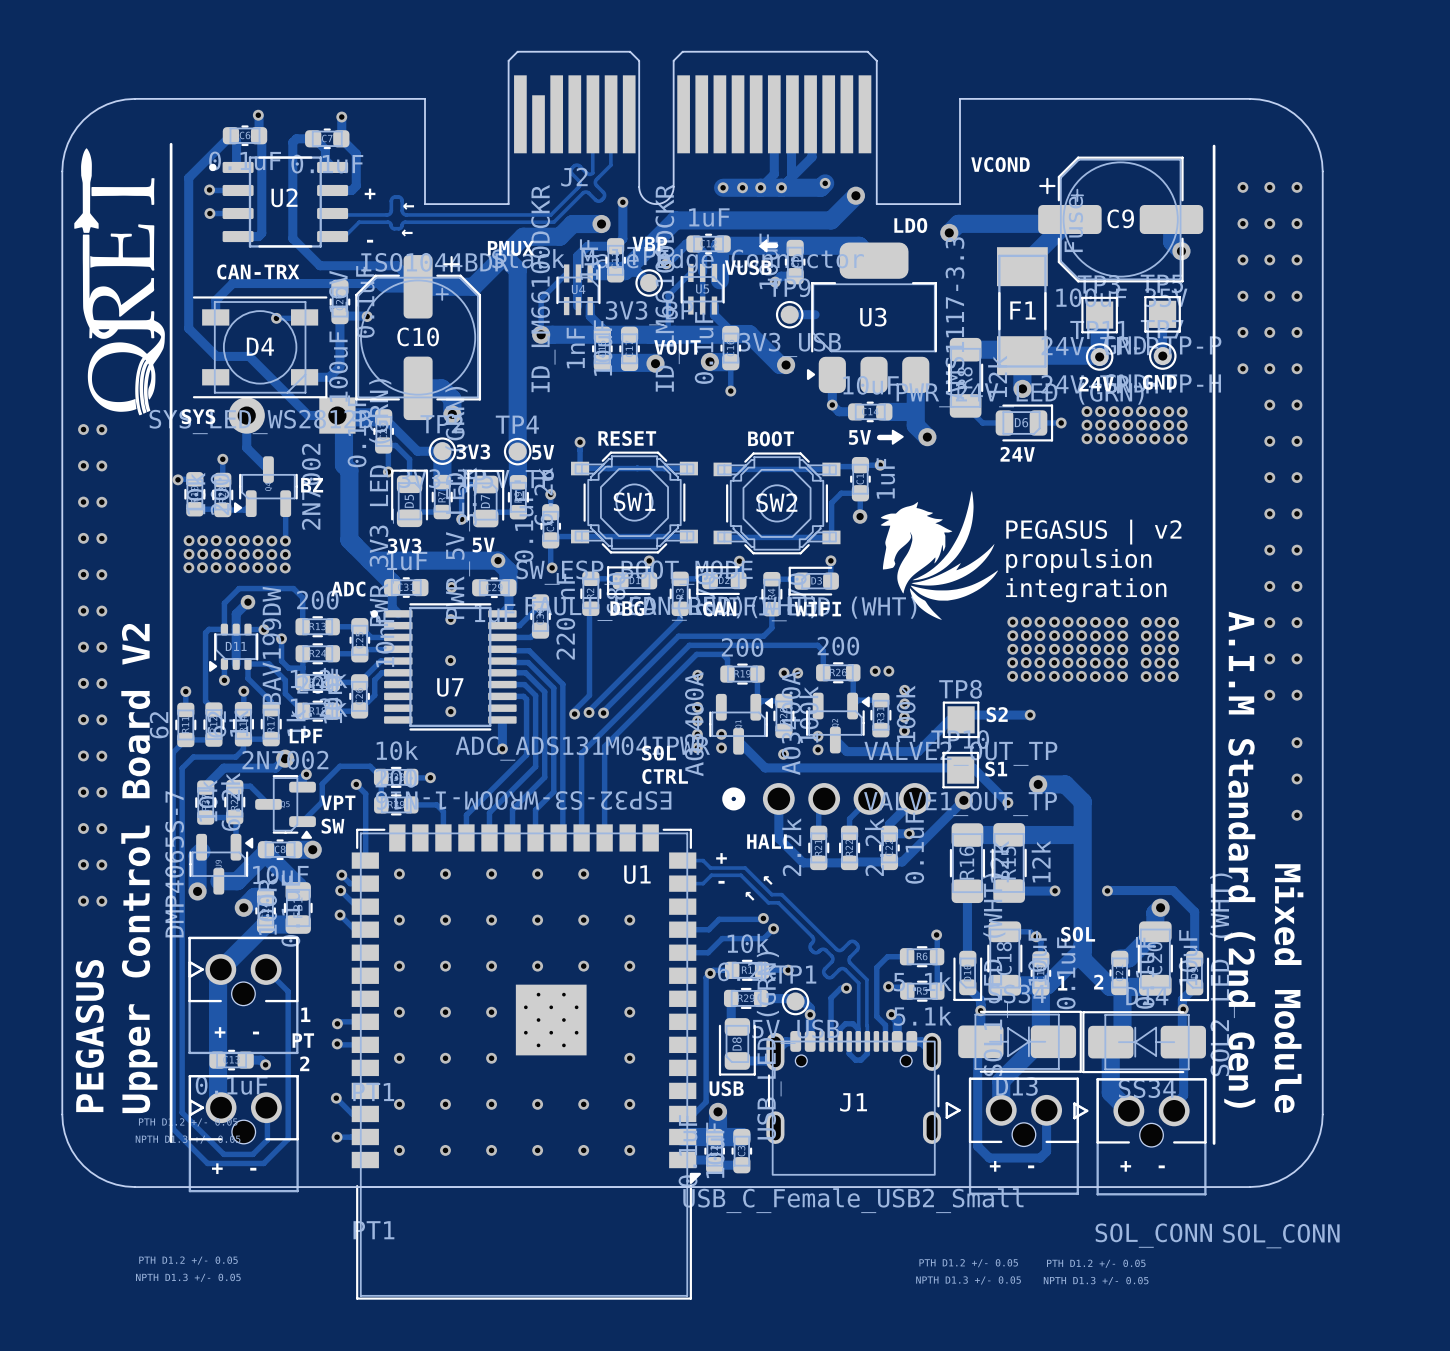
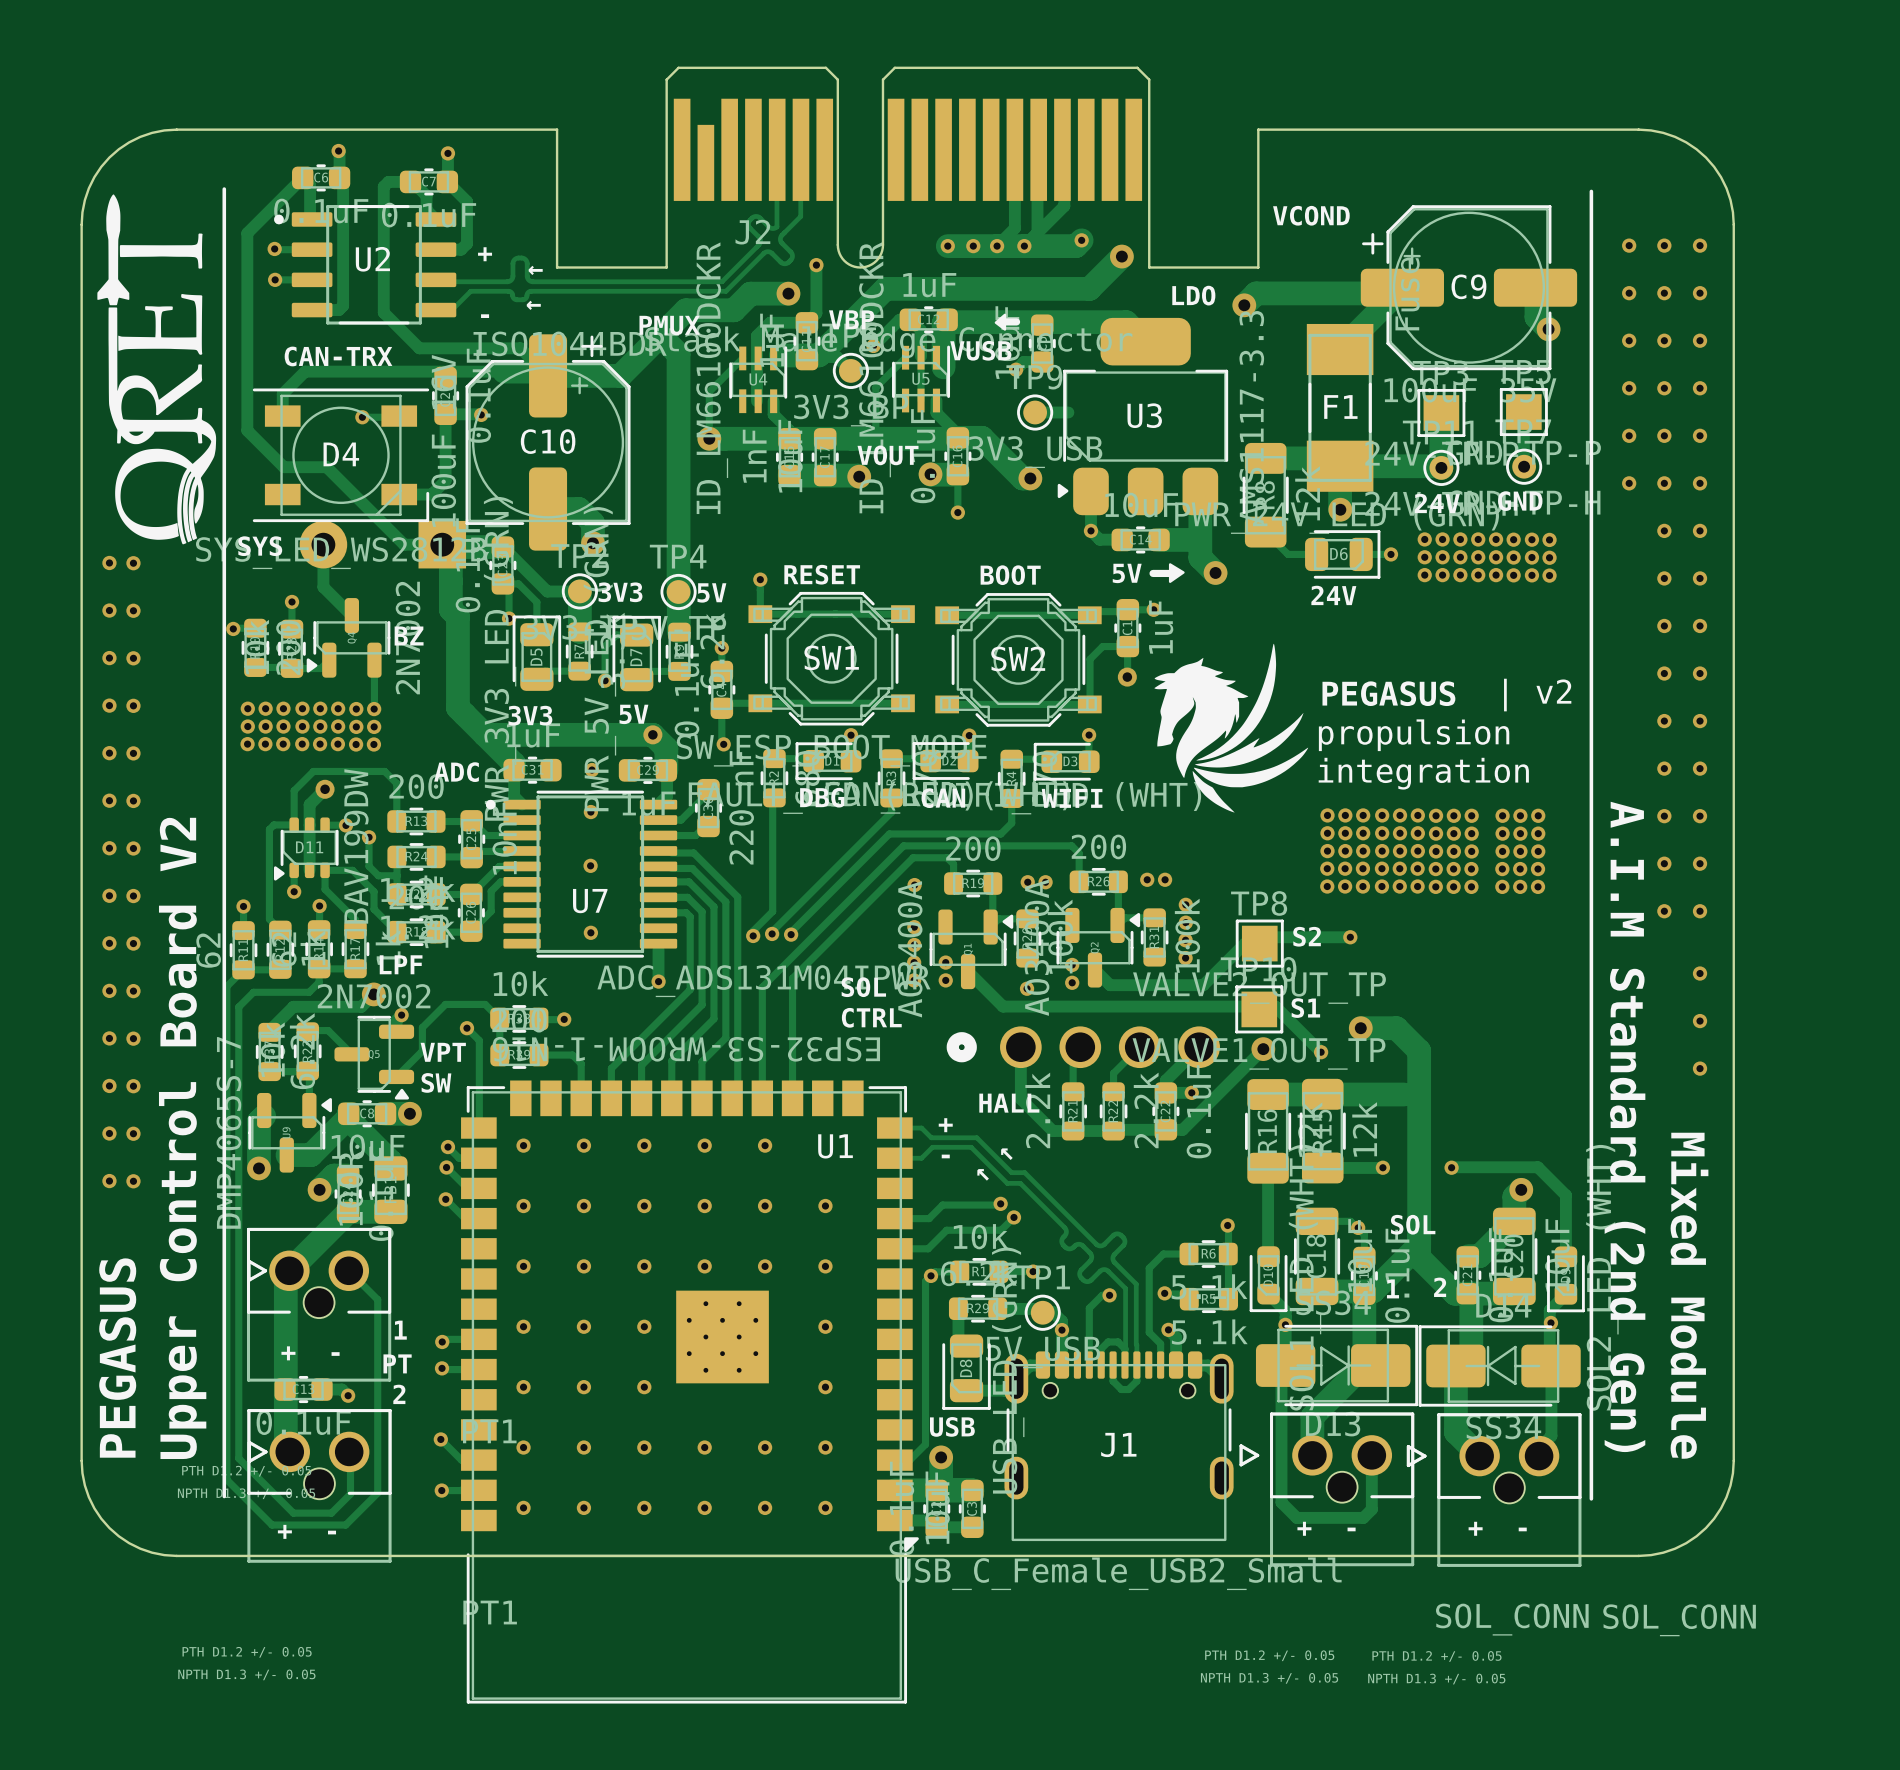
text: none -> | v2 (1537, 695)
text: PEGASUS | v2 (1093, 532) -> PEGASUS (1388, 693)

